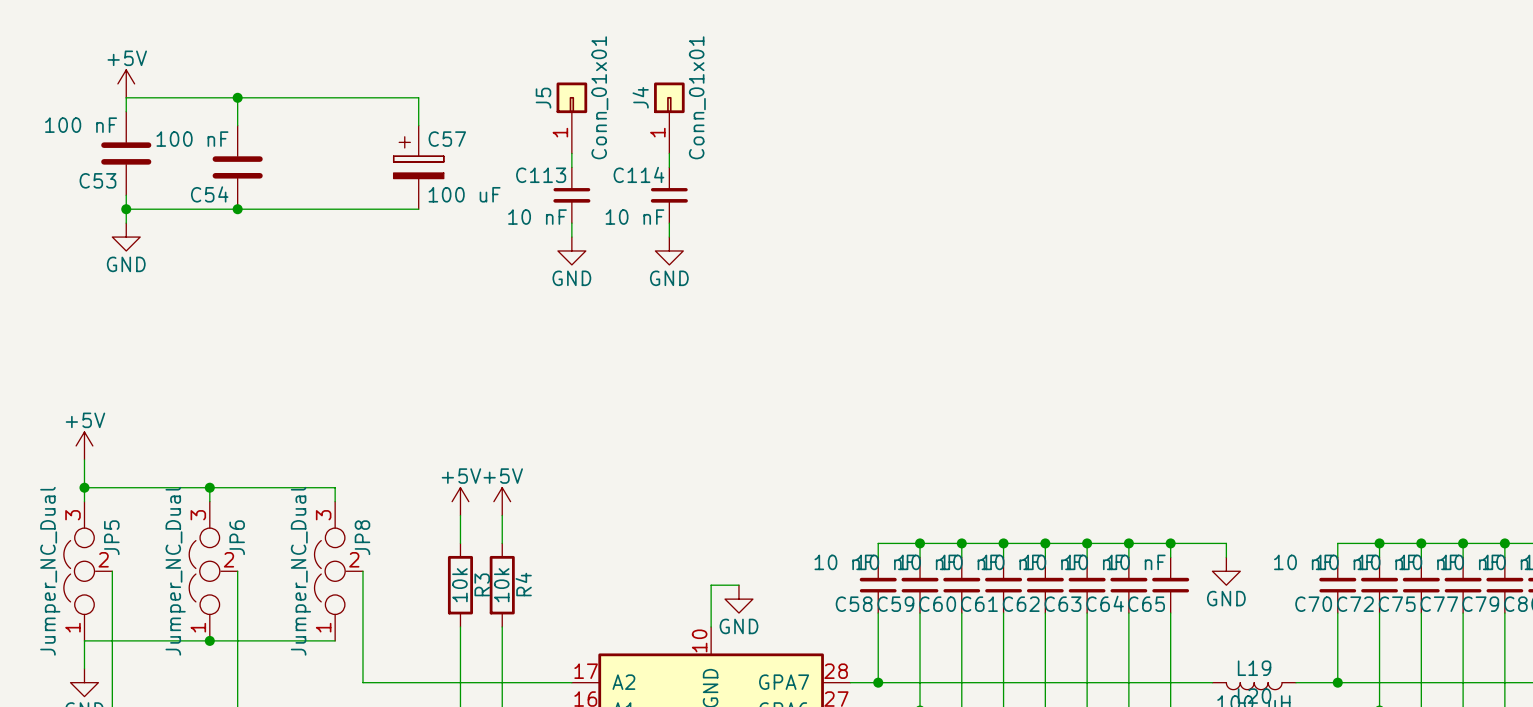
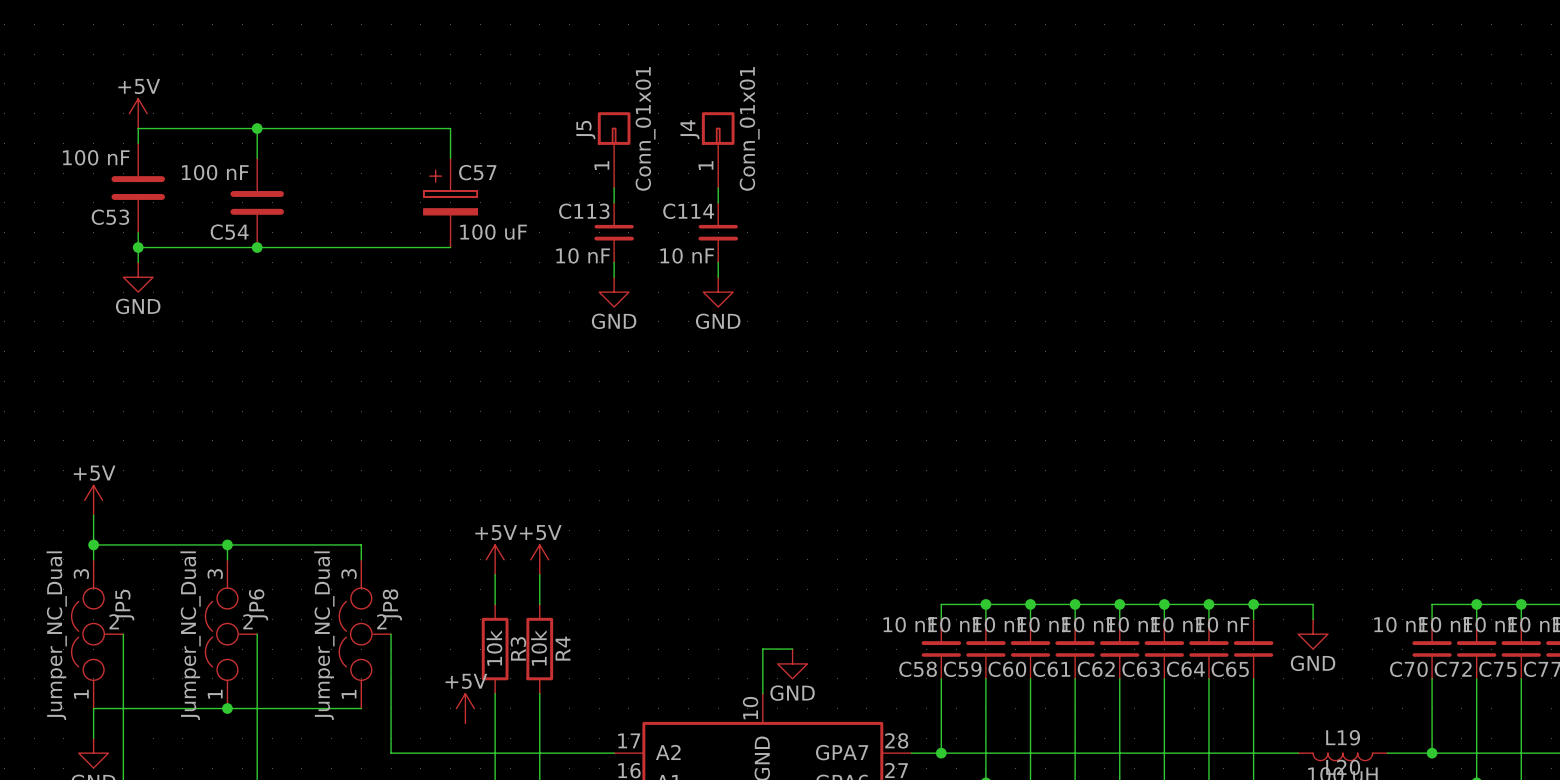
power symbol: none -> +5V (465, 708)

